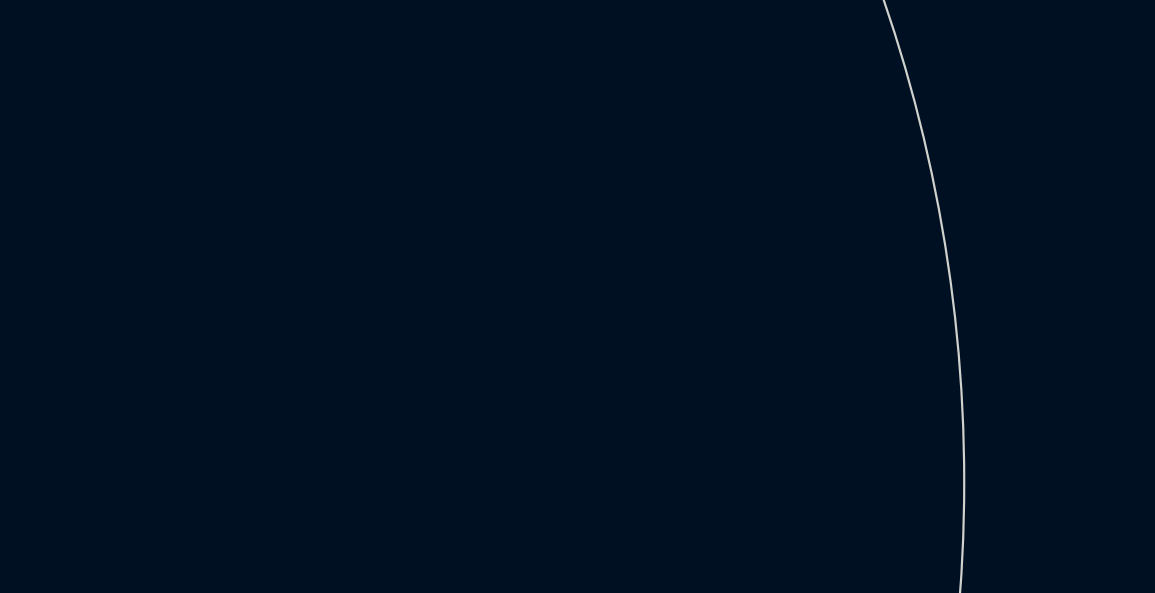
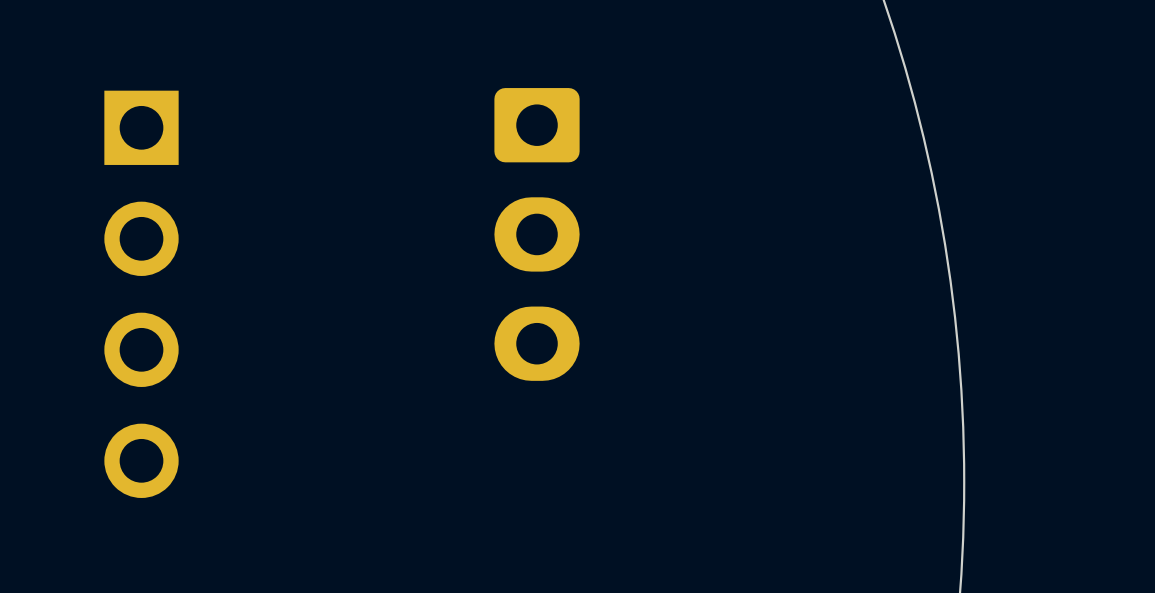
part: none -> (537, 234)
part: none -> (141, 294)

